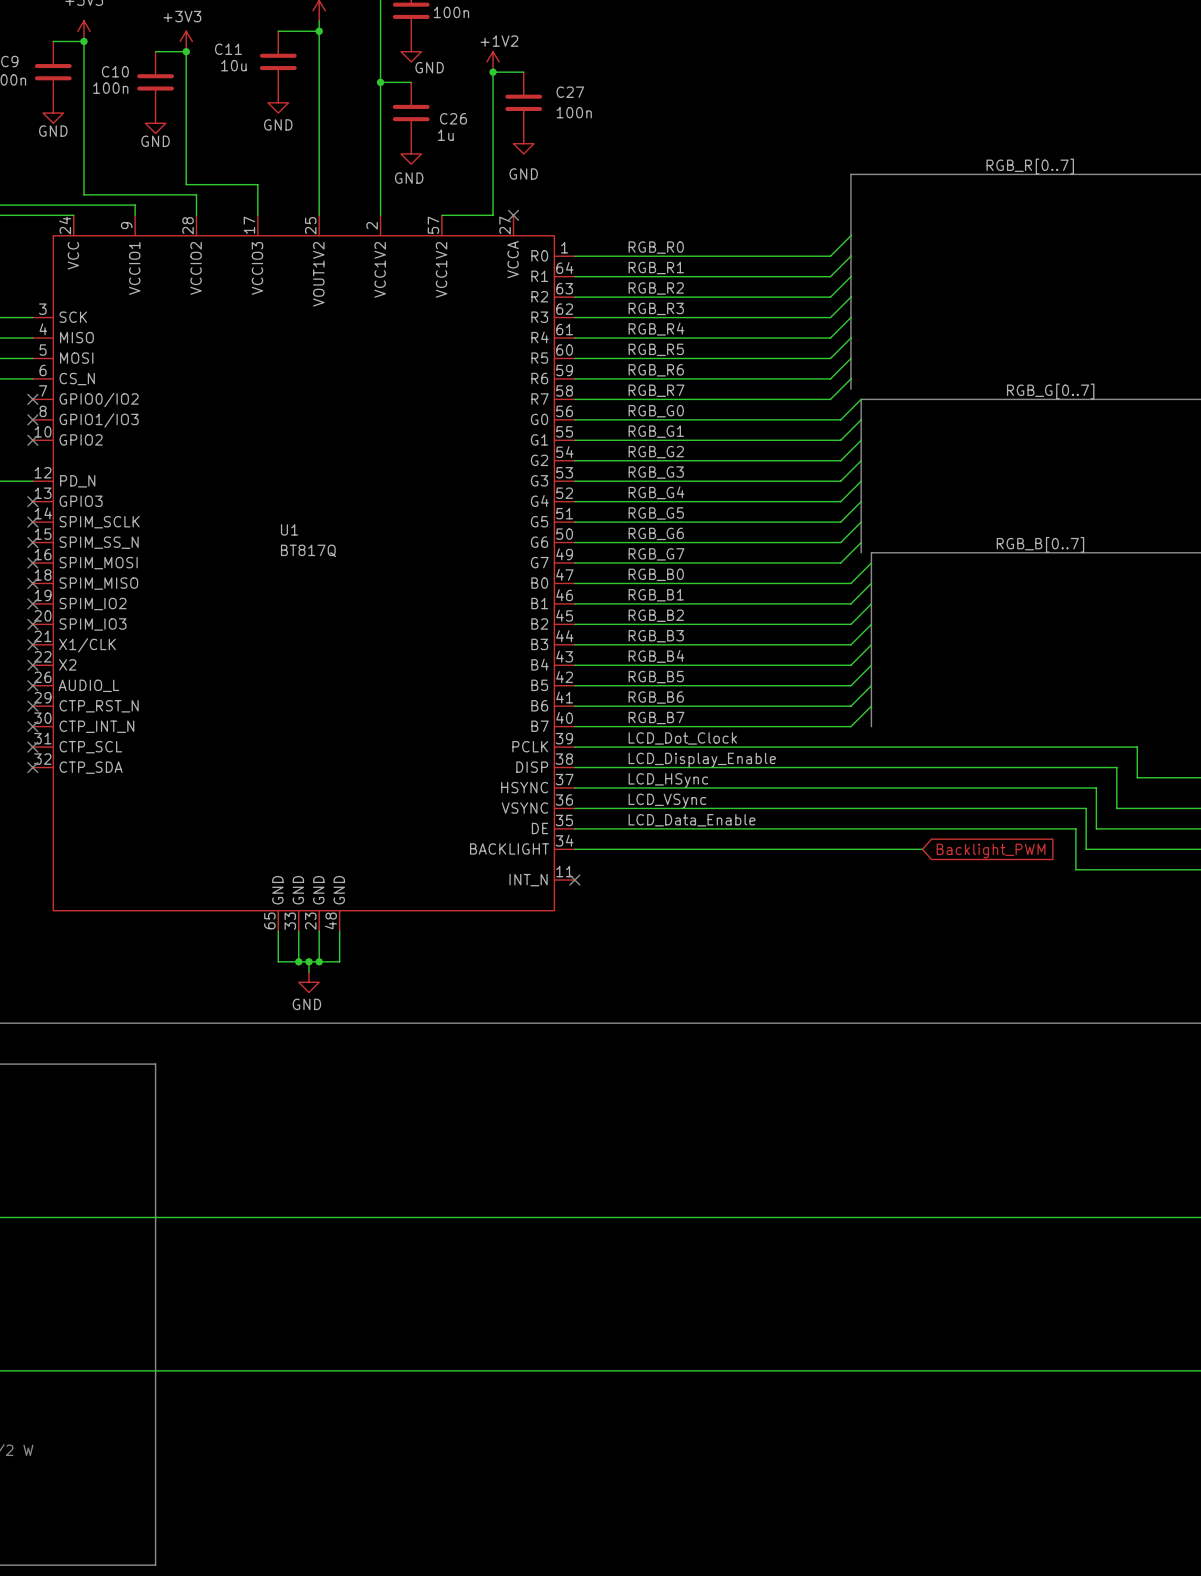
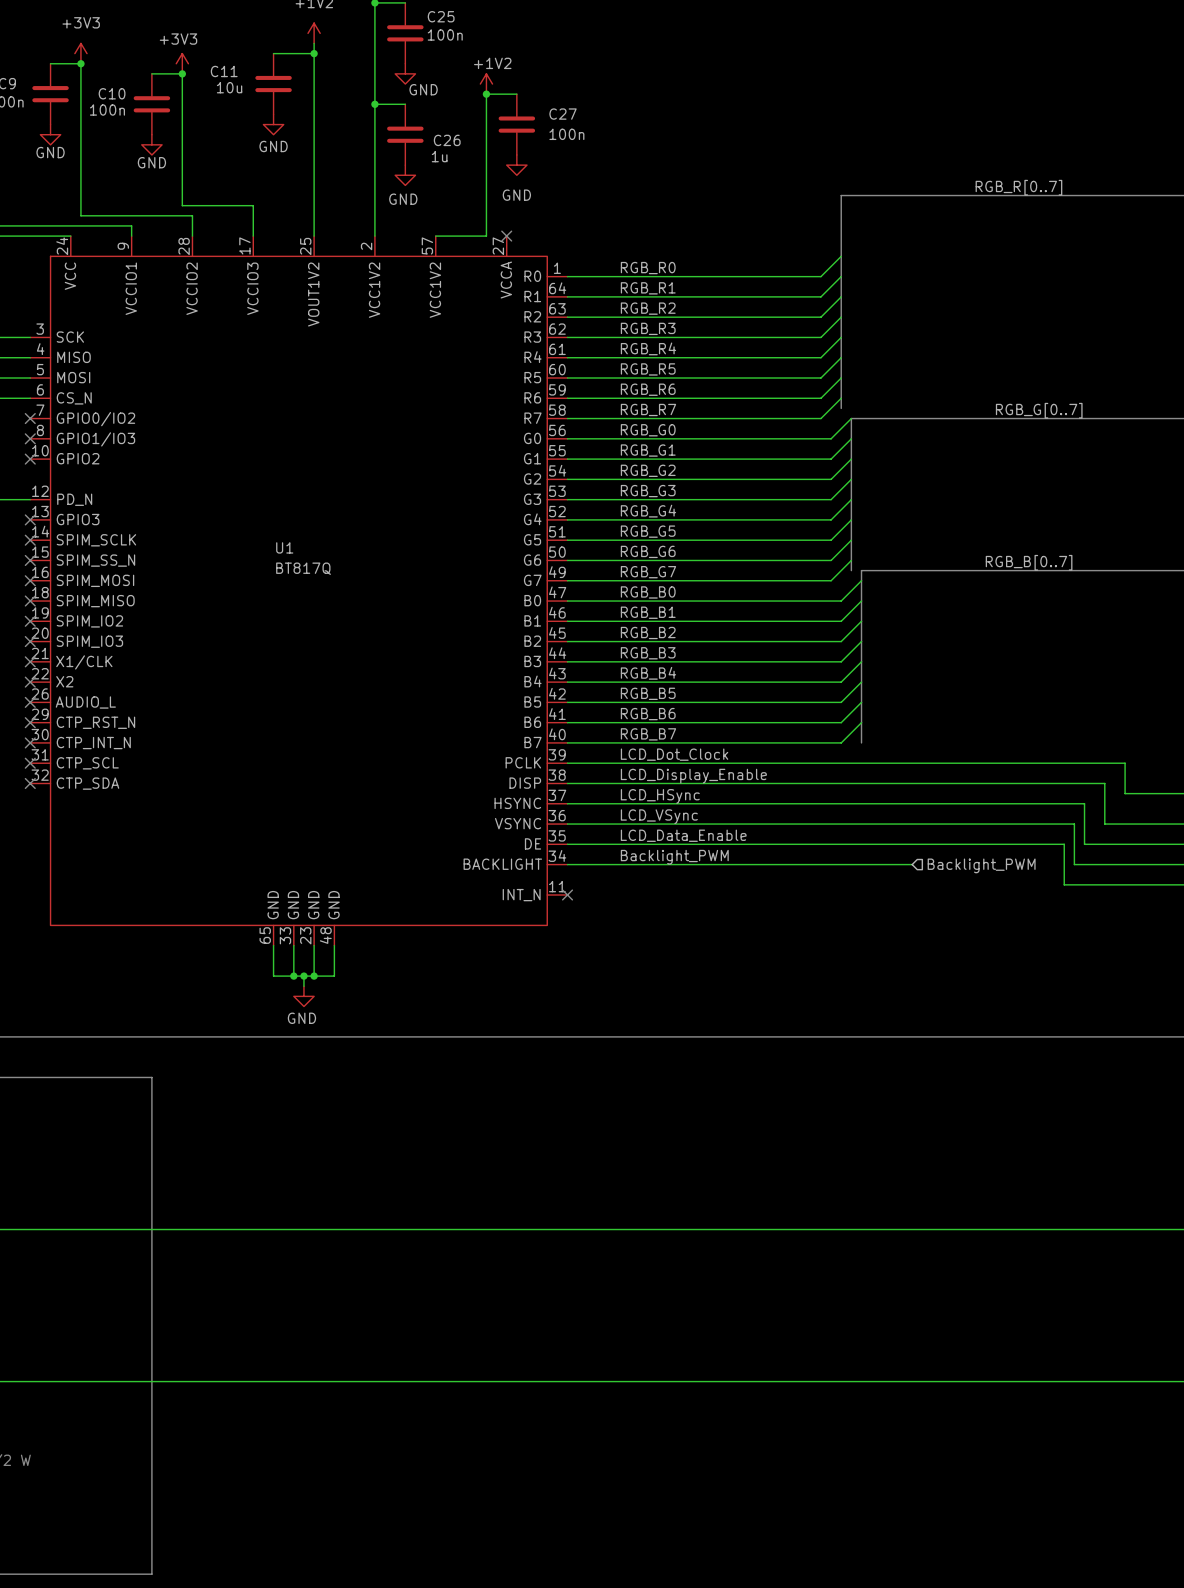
label: none -> Backlight_PWM (674, 857)
hierarchical label: none -> Backlight_PWM (981, 865)
global label: Backlight_PWM (991, 851) -> none

